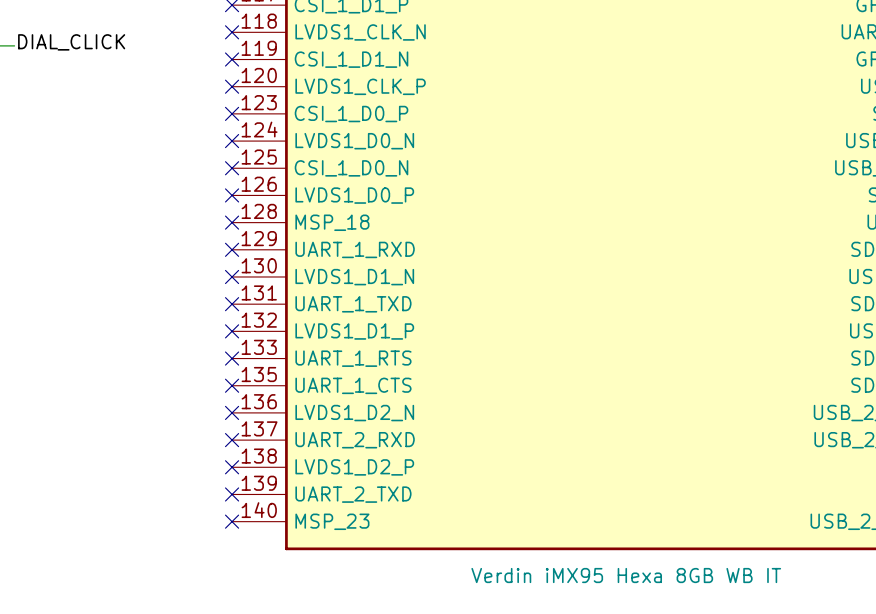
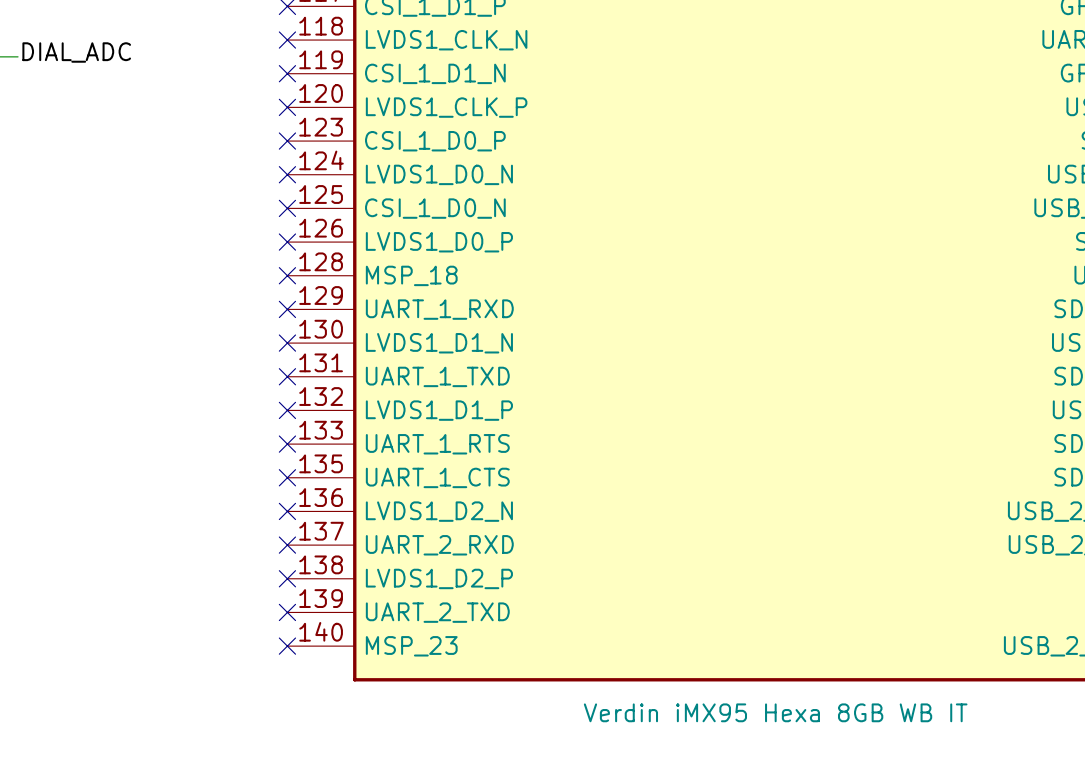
label: DIAL_CLICK (71, 42) -> DIAL_ADC (76, 52)

